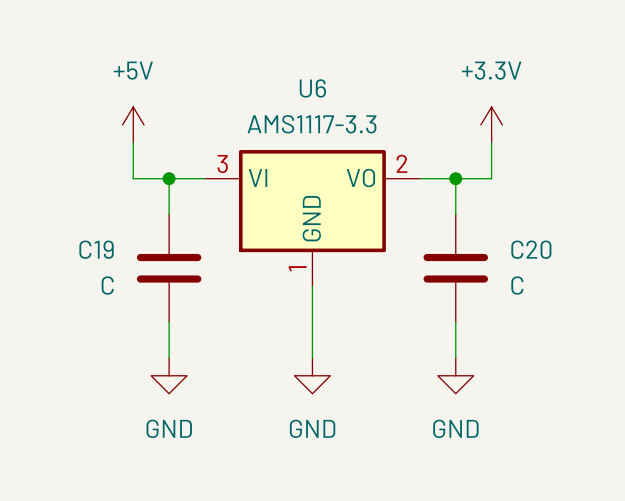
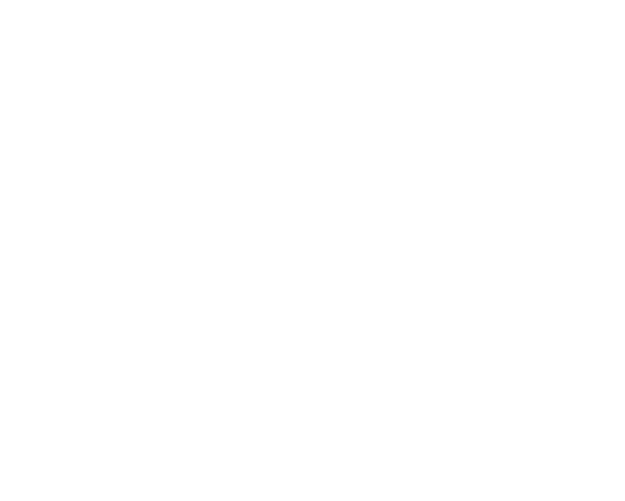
power symbol: +5V (133, 124) -> none
power symbol: +3.3V (491, 124) -> none
wire: (133, 142) (133, 178) (204, 178) -> none
wire: (491, 142) (491, 178) (419, 178) -> none
wire: (169, 178) (169, 214) -> none
junction: (169, 178) -> none
wire: (455, 178) (455, 214) -> none
junction: (455, 178) -> none
U6: AMS1117-3.3 (312, 218) -> none
C19: C (169, 268) -> none
C20: C (455, 268) -> none
wire: (312, 286) (312, 357) -> none
wire: (169, 322) (169, 357) -> none
wire: (455, 322) (455, 357) -> none
power symbol: GND (169, 375) -> none
power symbol: GND (312, 375) -> none
power symbol: GND (455, 375) -> none

